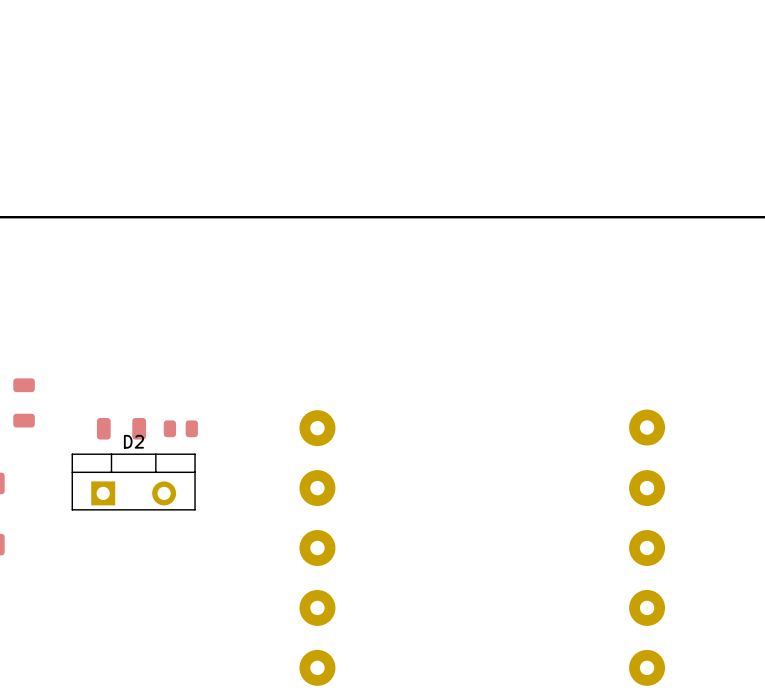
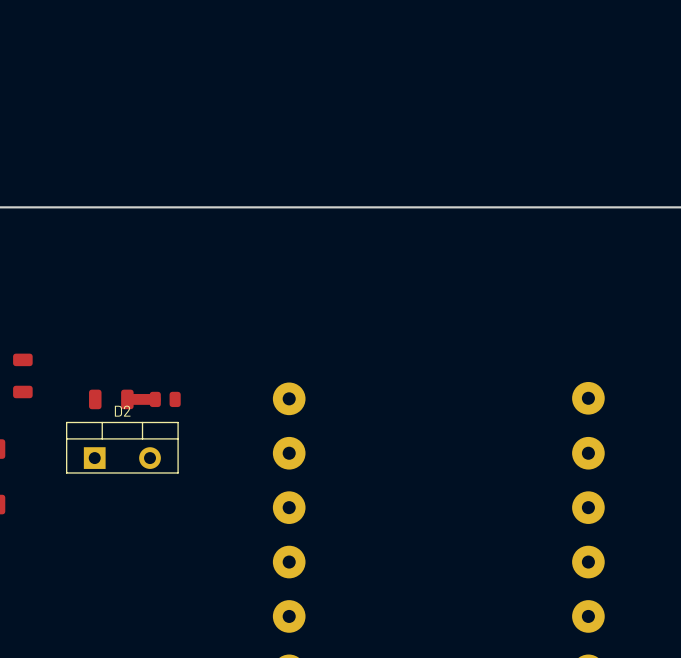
top track: none -> (155, 399) (127, 399)

